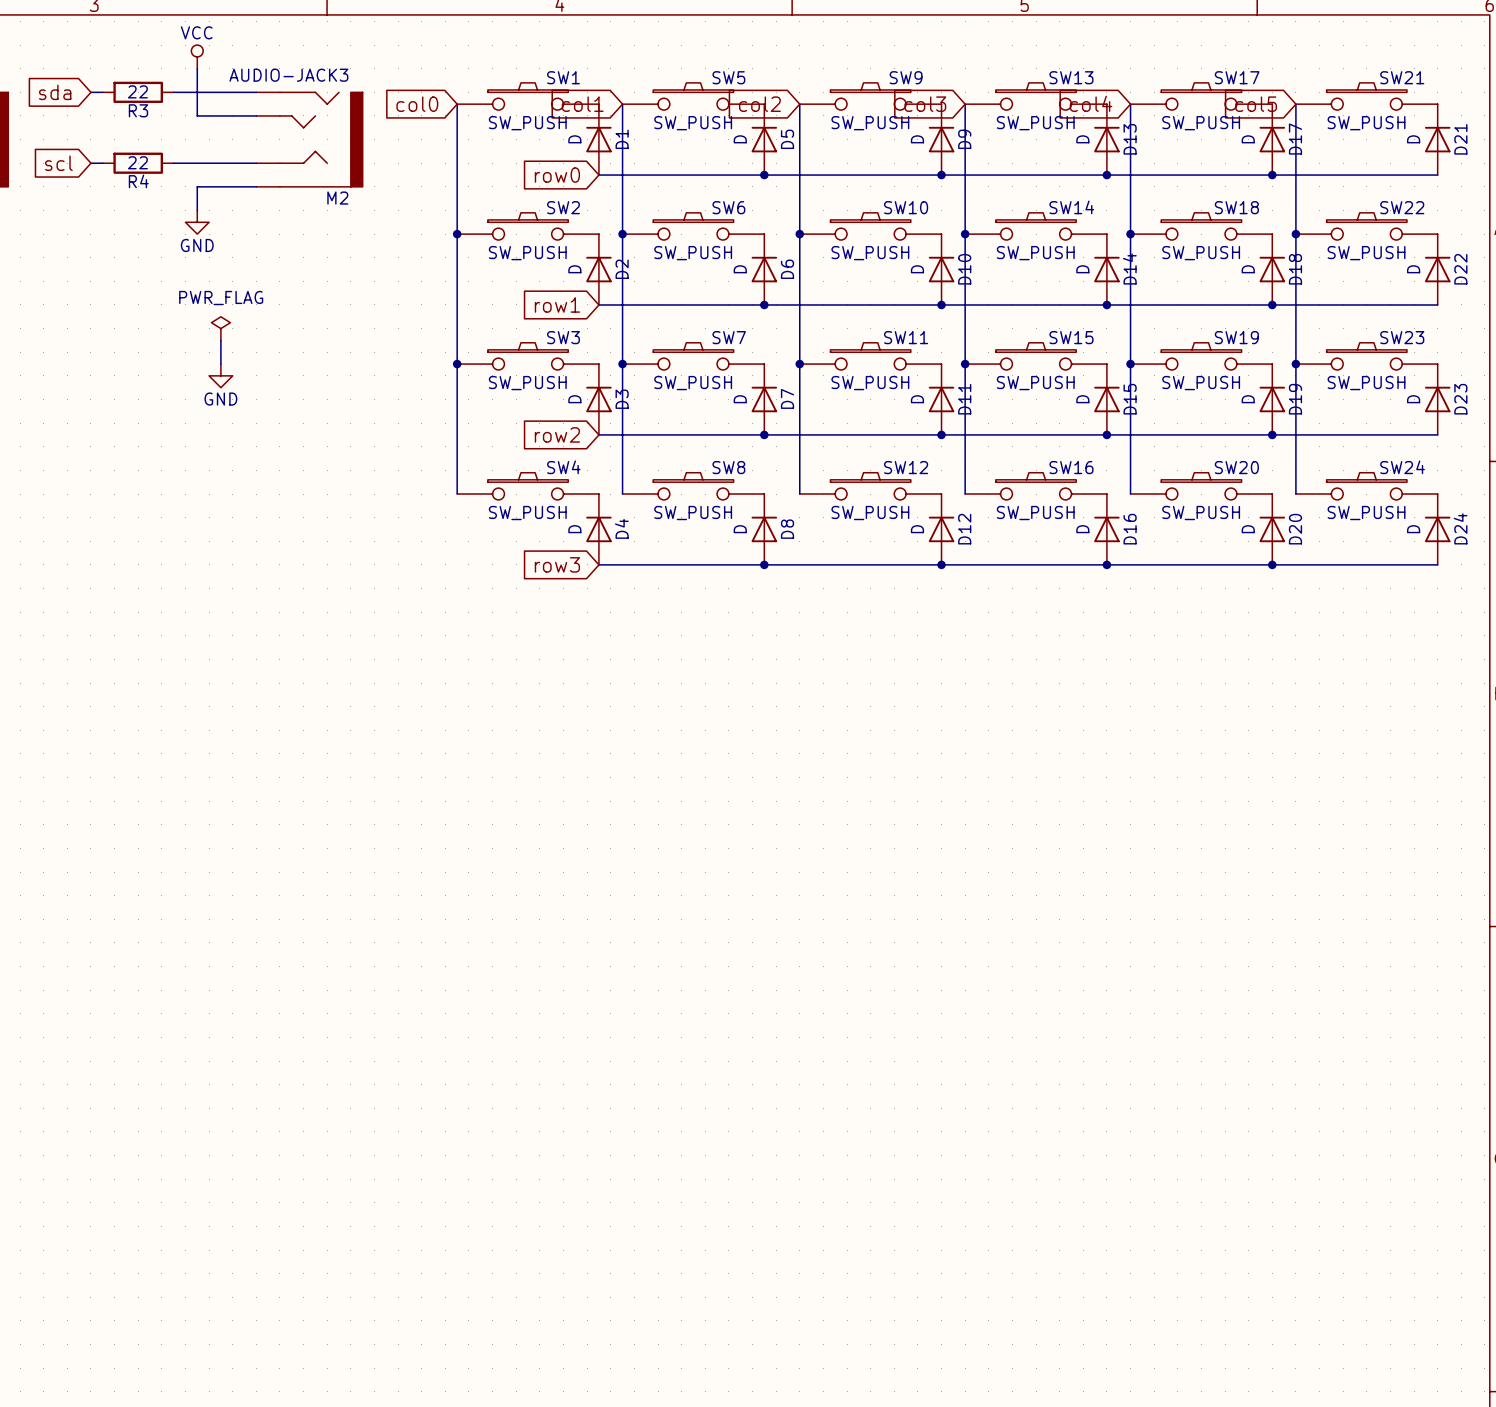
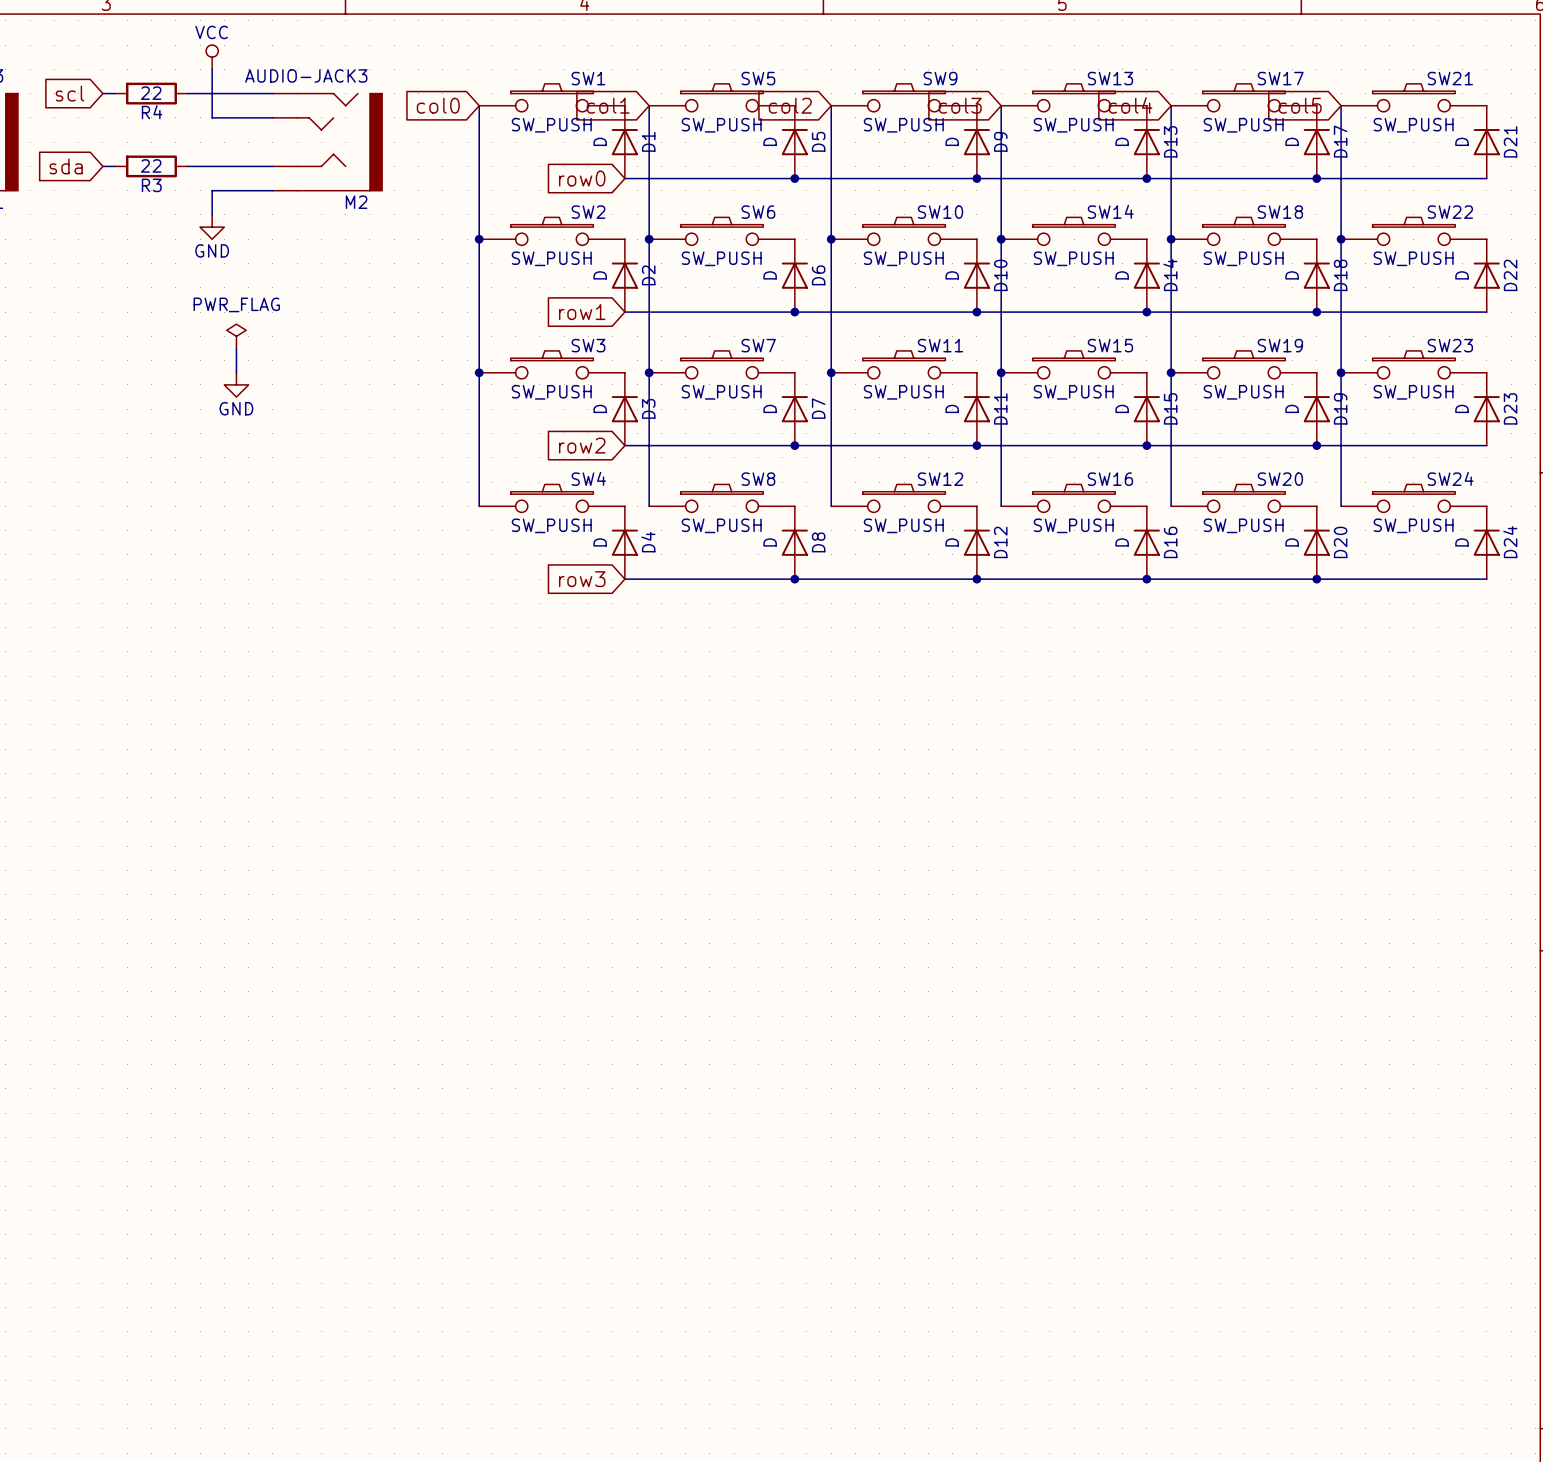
global label: sda (55, 92) -> scl (69, 93)
R3 name: R3 (138, 110) -> R4 (152, 112)
global label: scl (58, 163) -> sda (66, 166)
R4 name: R4 (138, 181) -> R3 (151, 185)

